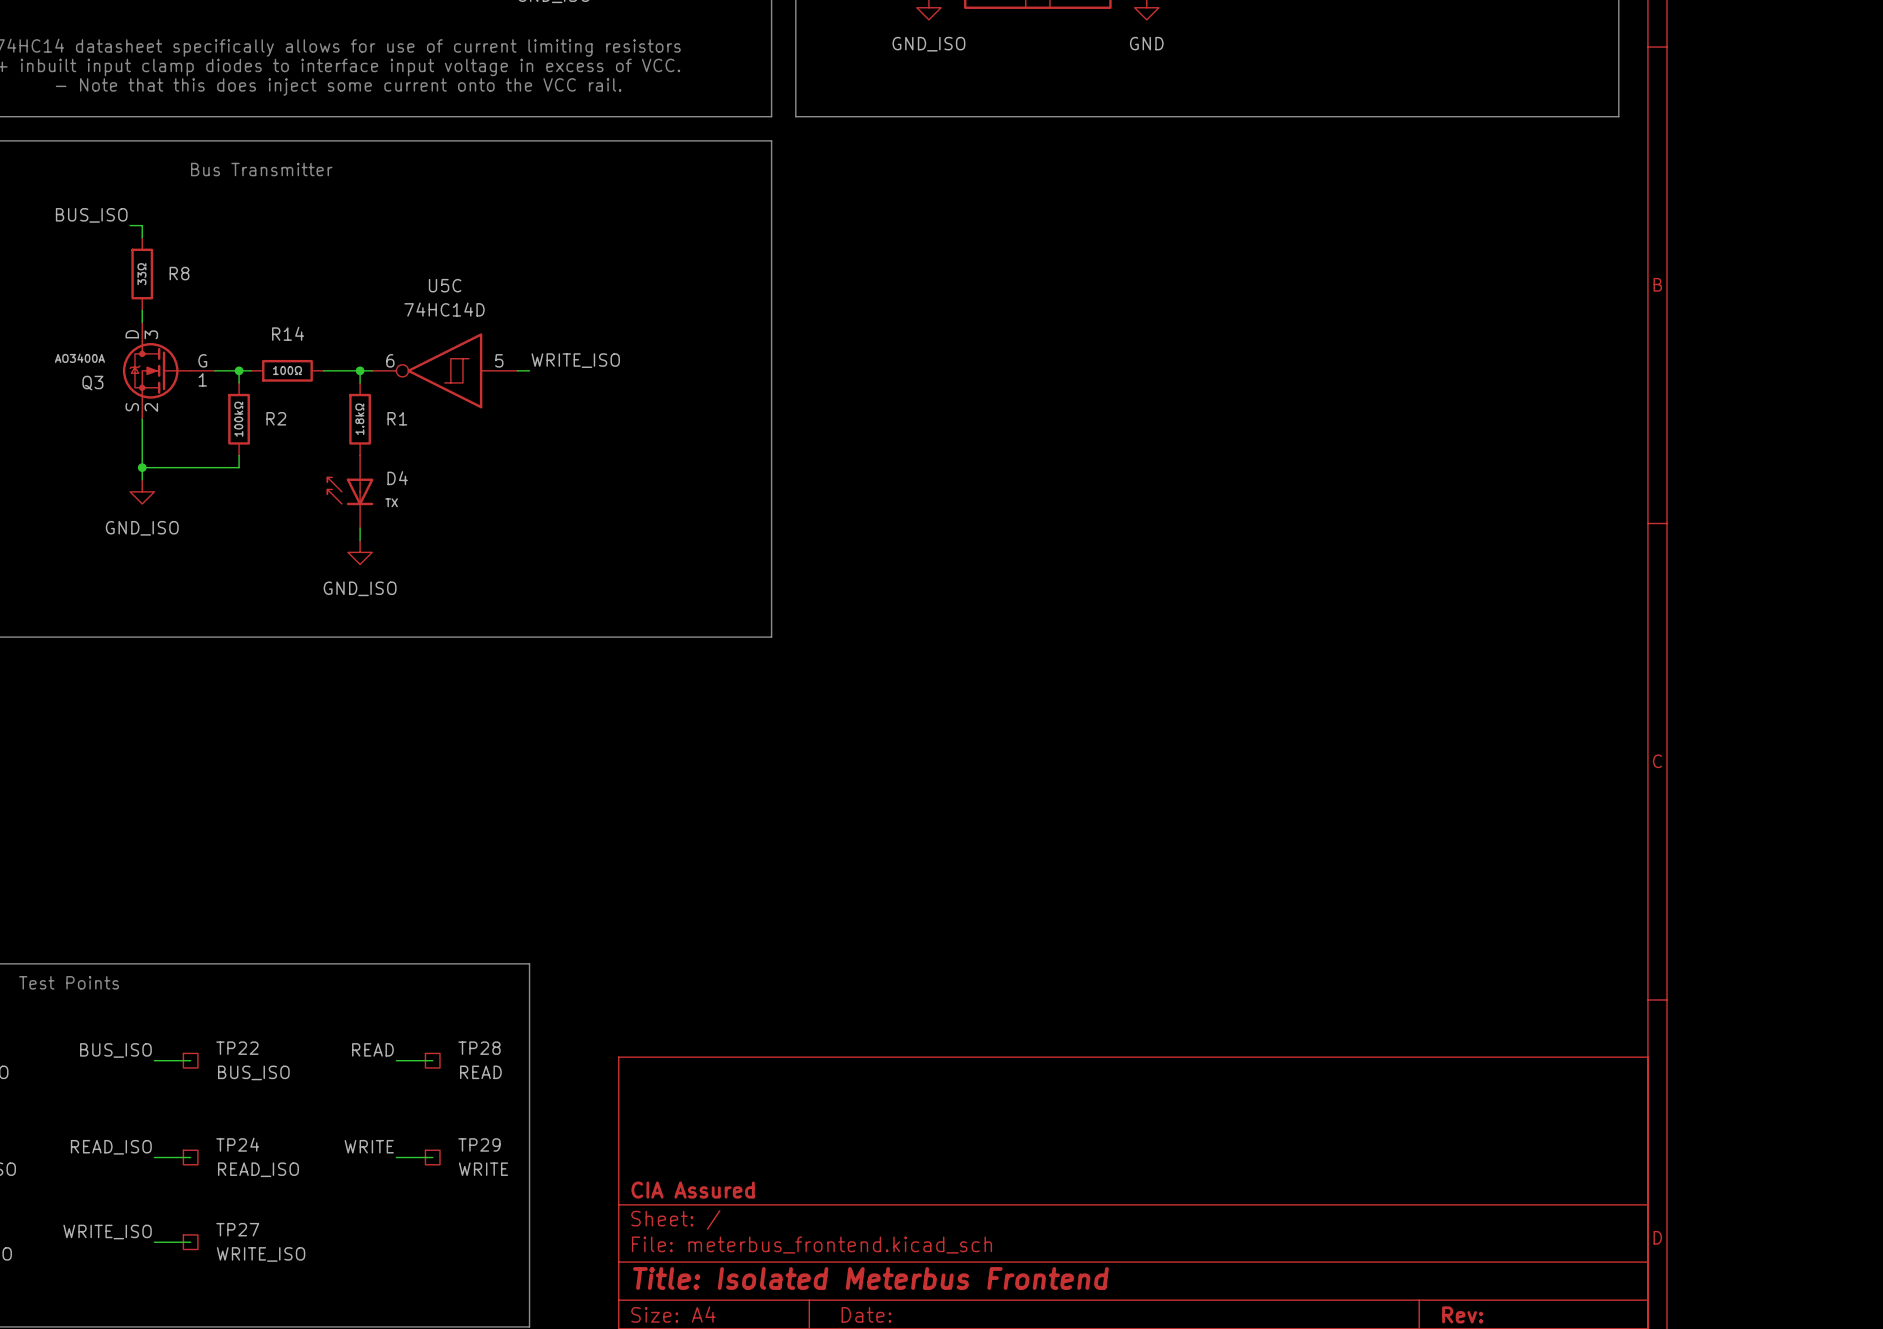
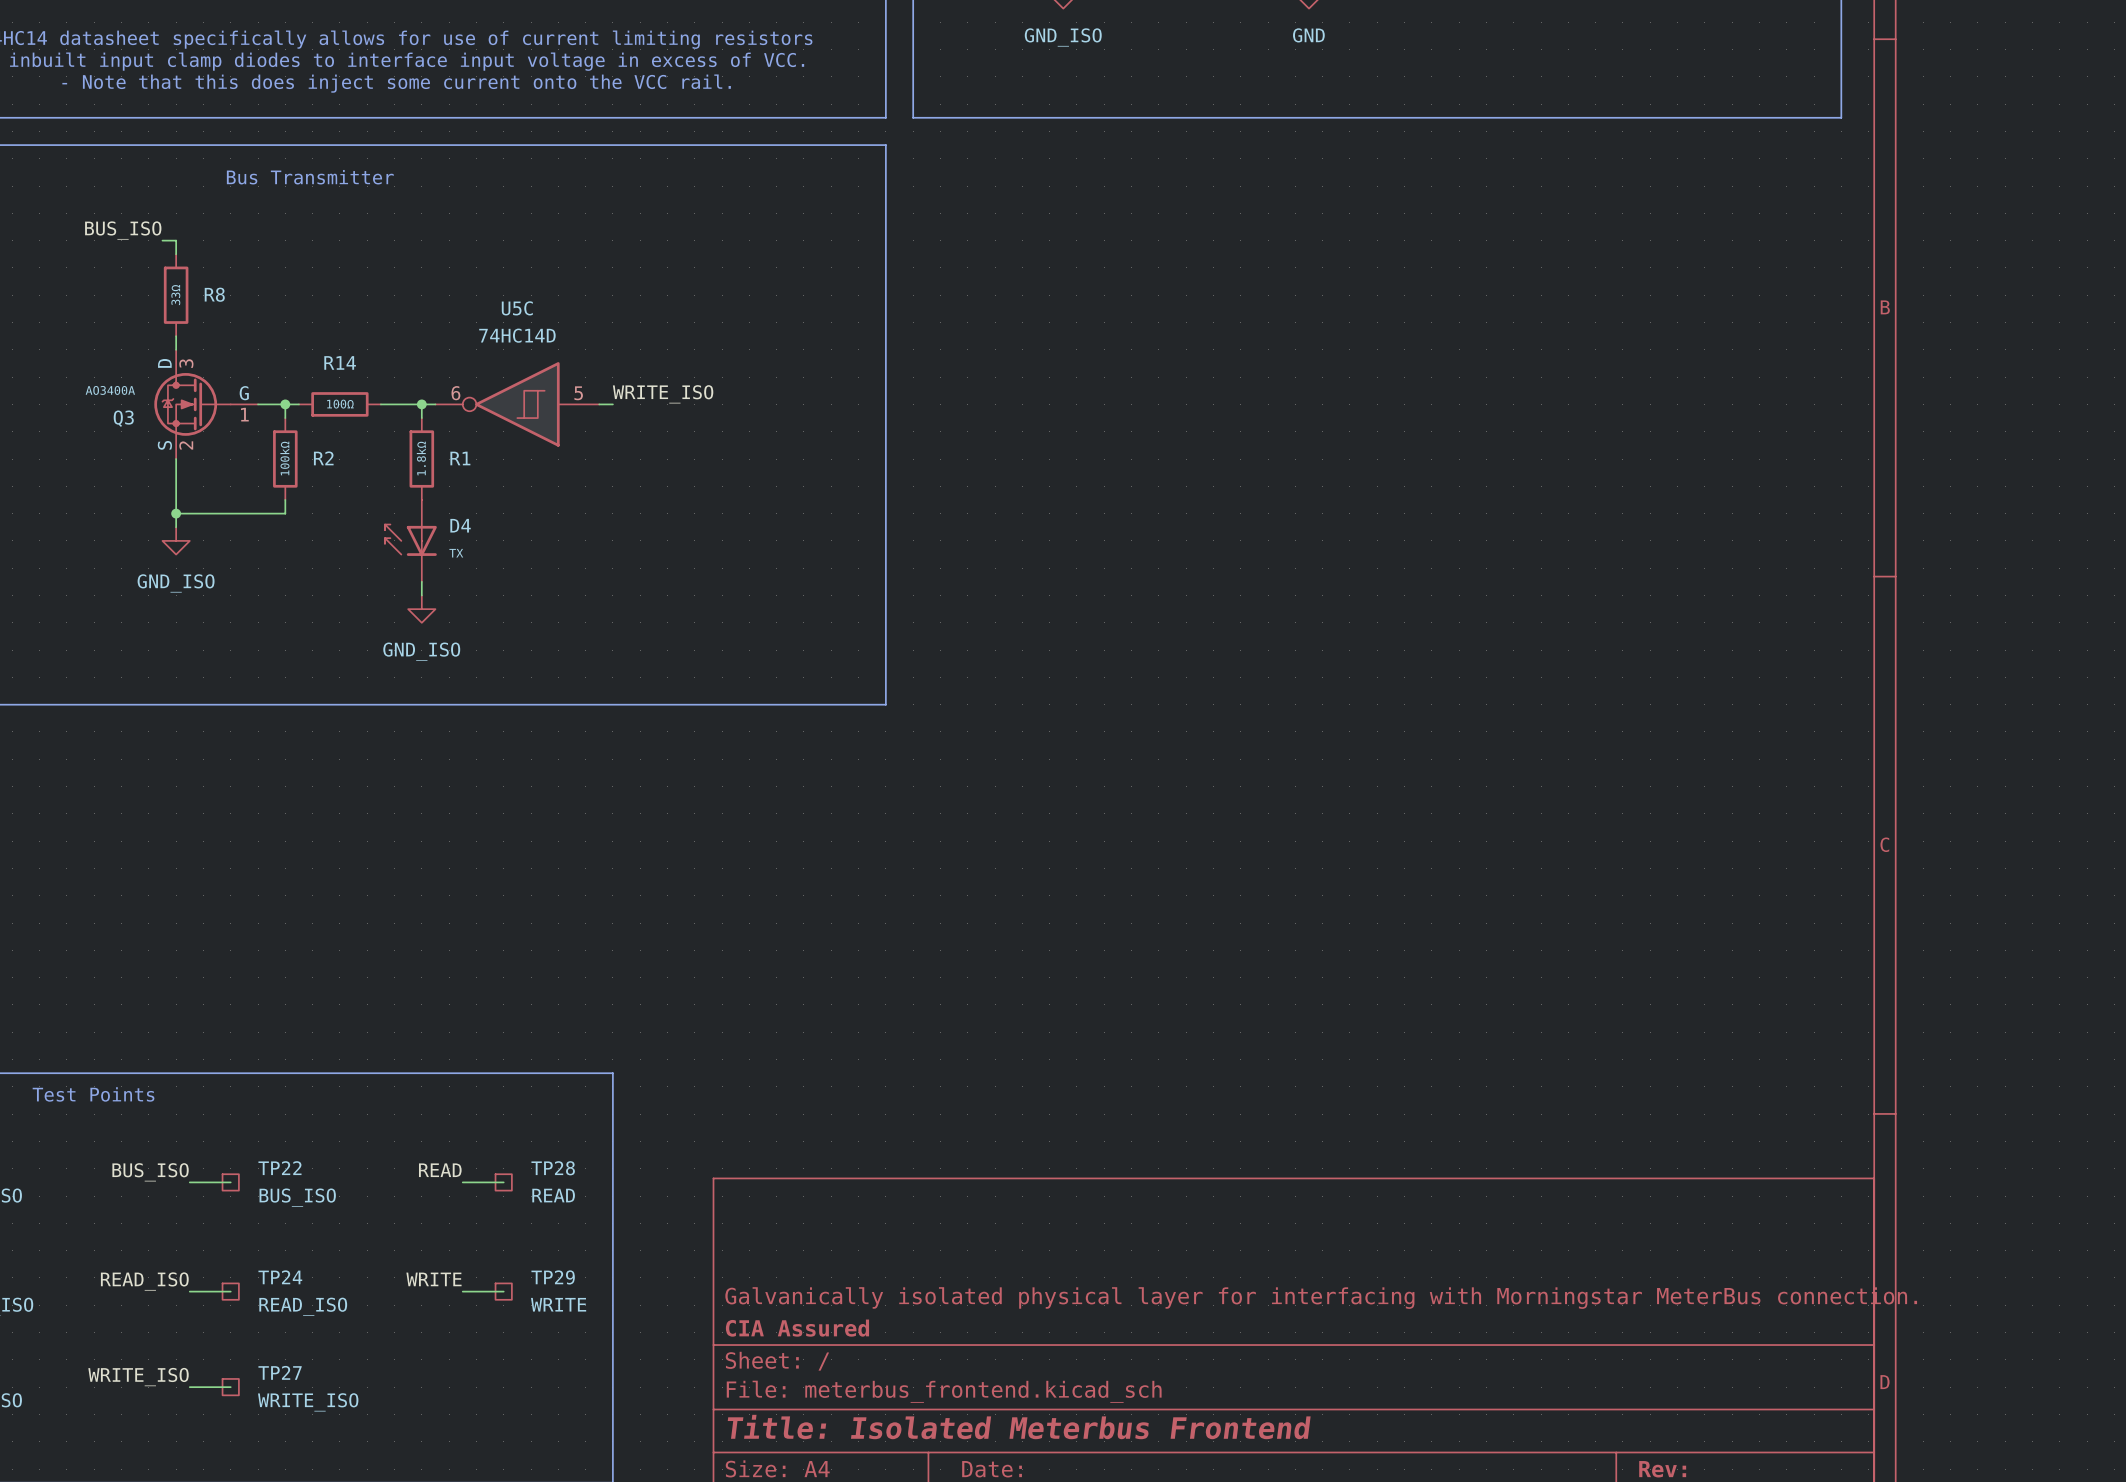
title block: none -> Galvanically isolated physical layer for interfacing with Morningstar MeterBus connection. (1321, 1298)

